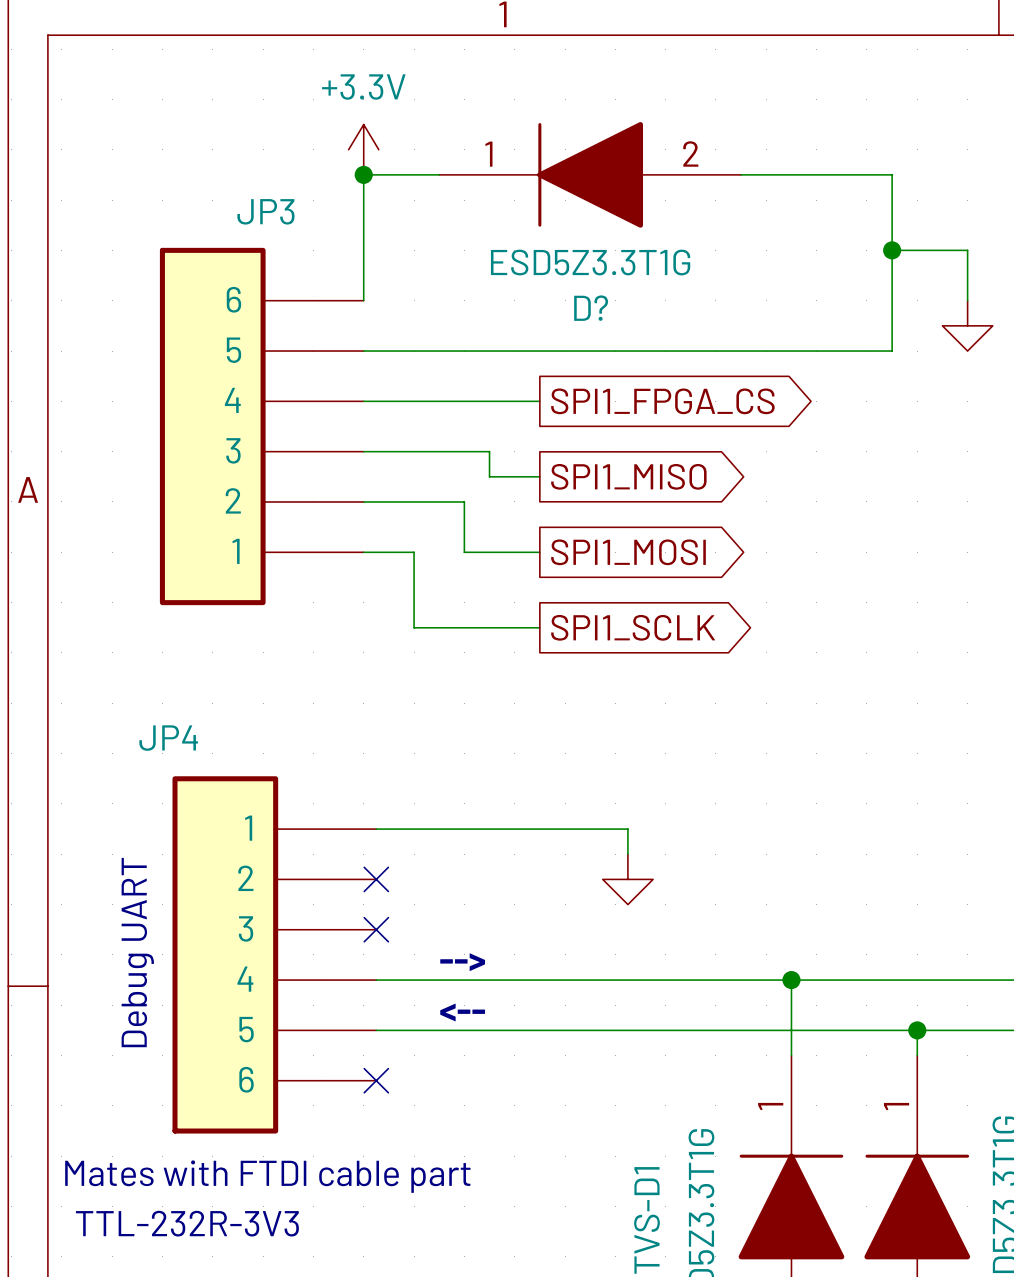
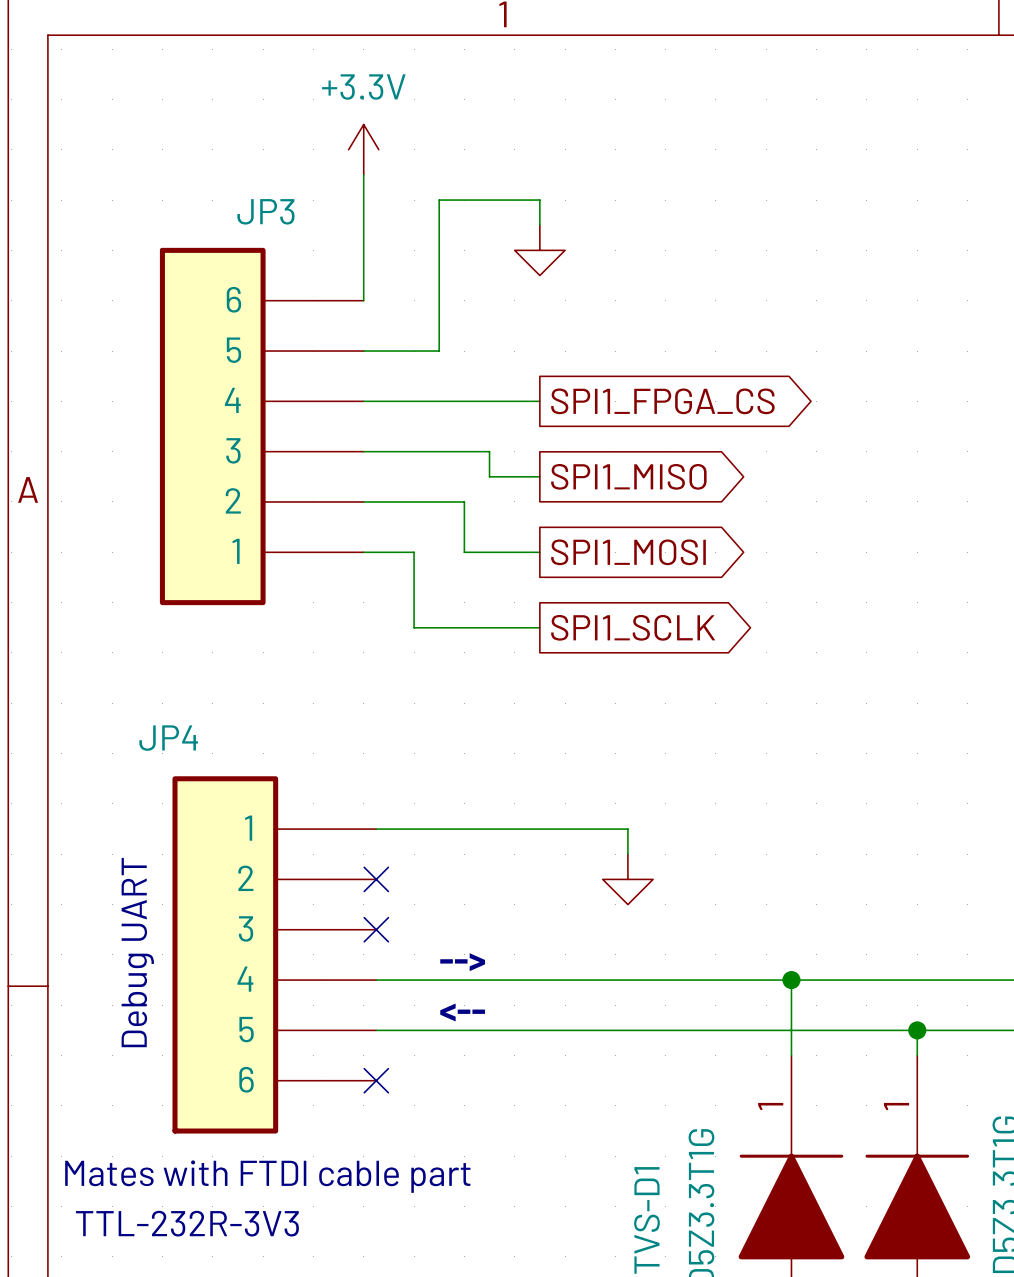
wire: (363, 174) (439, 174) -> none
junction: (363, 174) -> none
D?: ESD5Z3.3T1G (590, 174) -> none
wire: (741, 174) (892, 174) (892, 351) (439, 351) -> (539, 225) (539, 200) (439, 200) (439, 351)
wire: (892, 250) (967, 250) (967, 300) -> none
junction: (892, 250) -> none
power symbol position: (967, 325) -> (539, 250)

